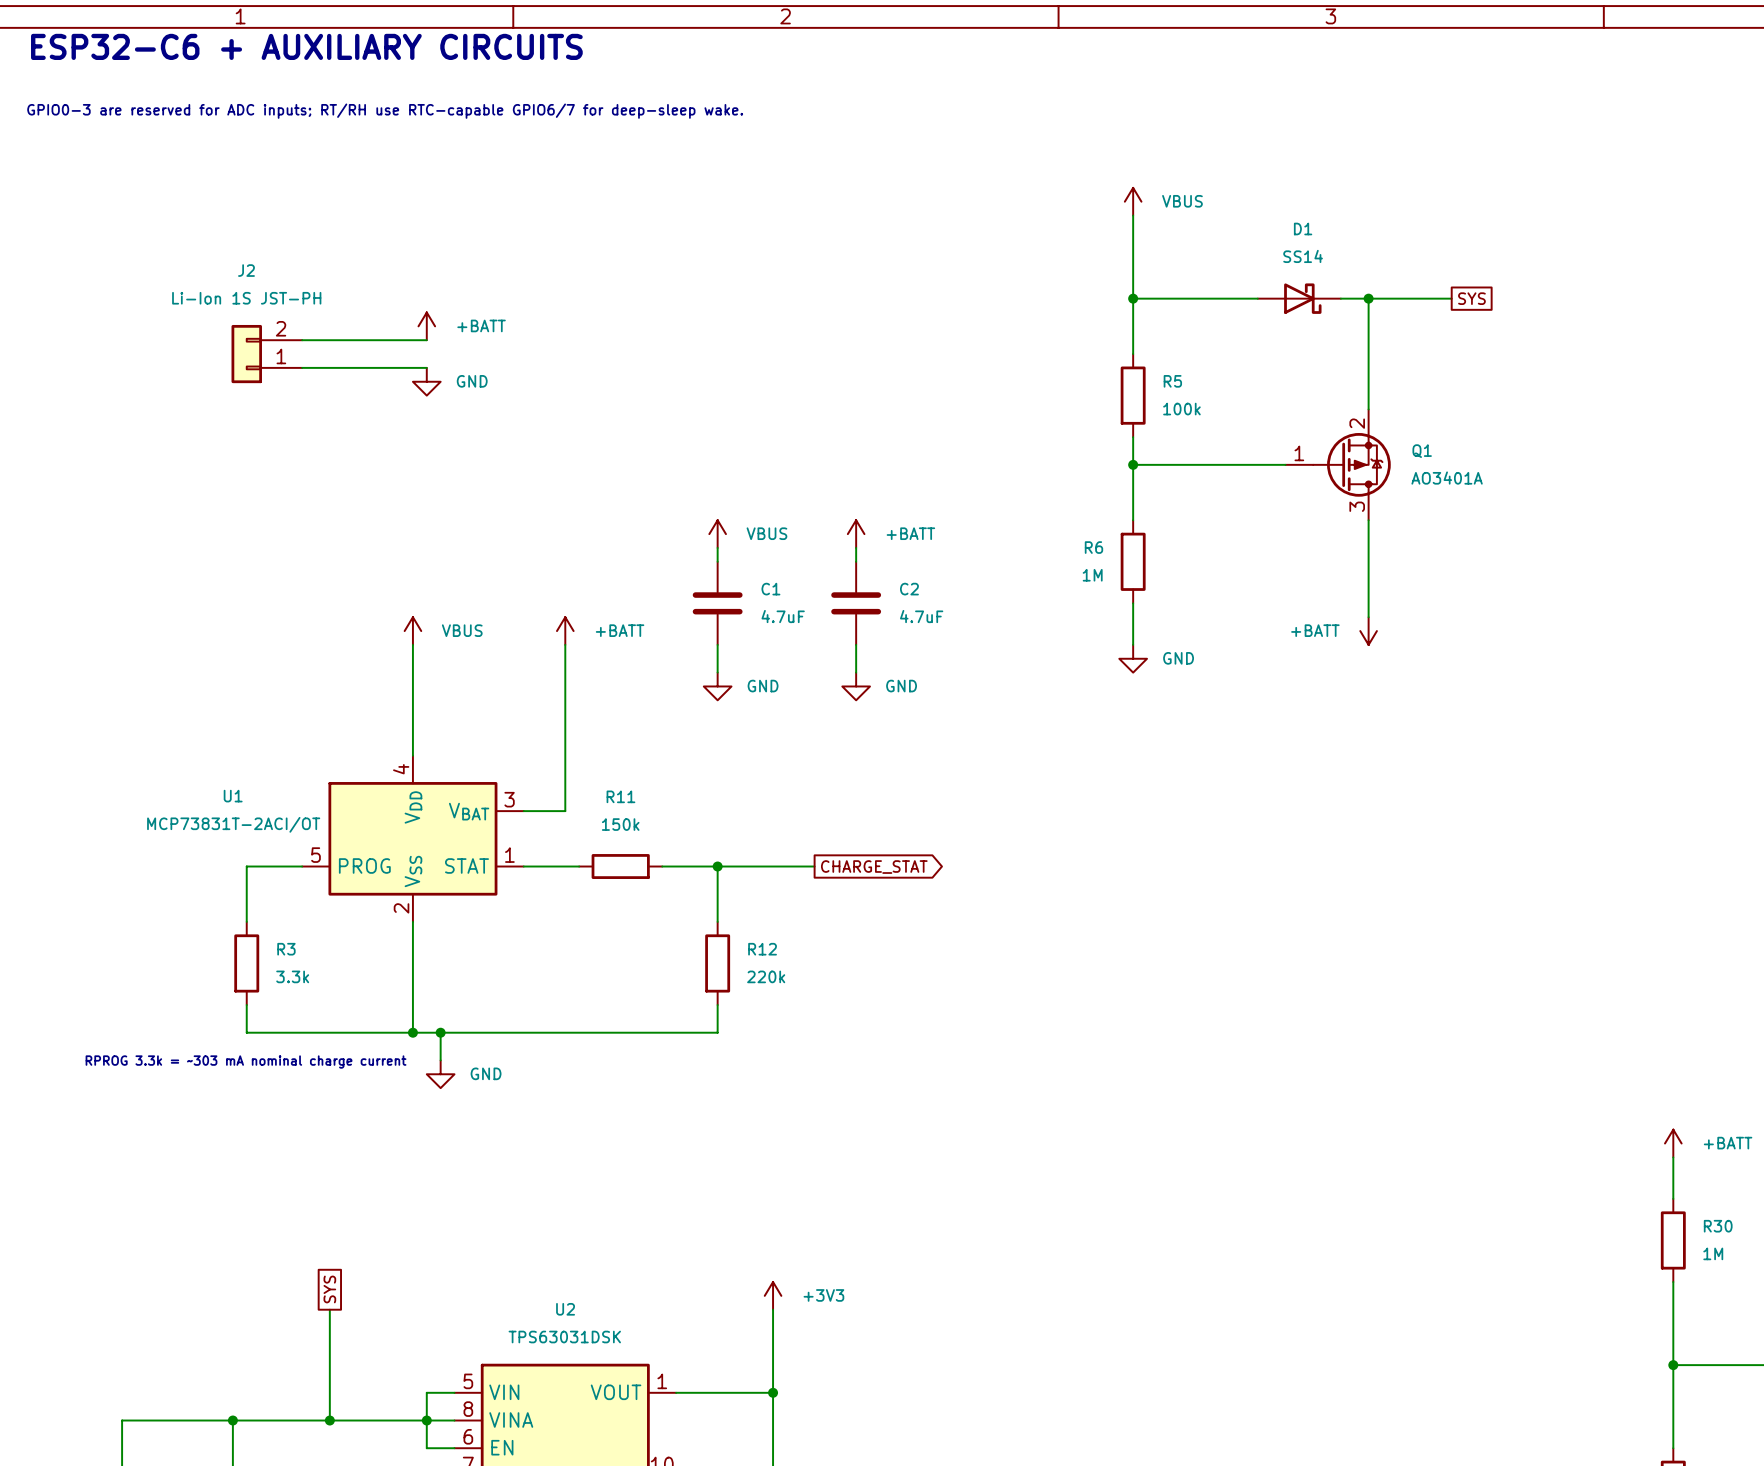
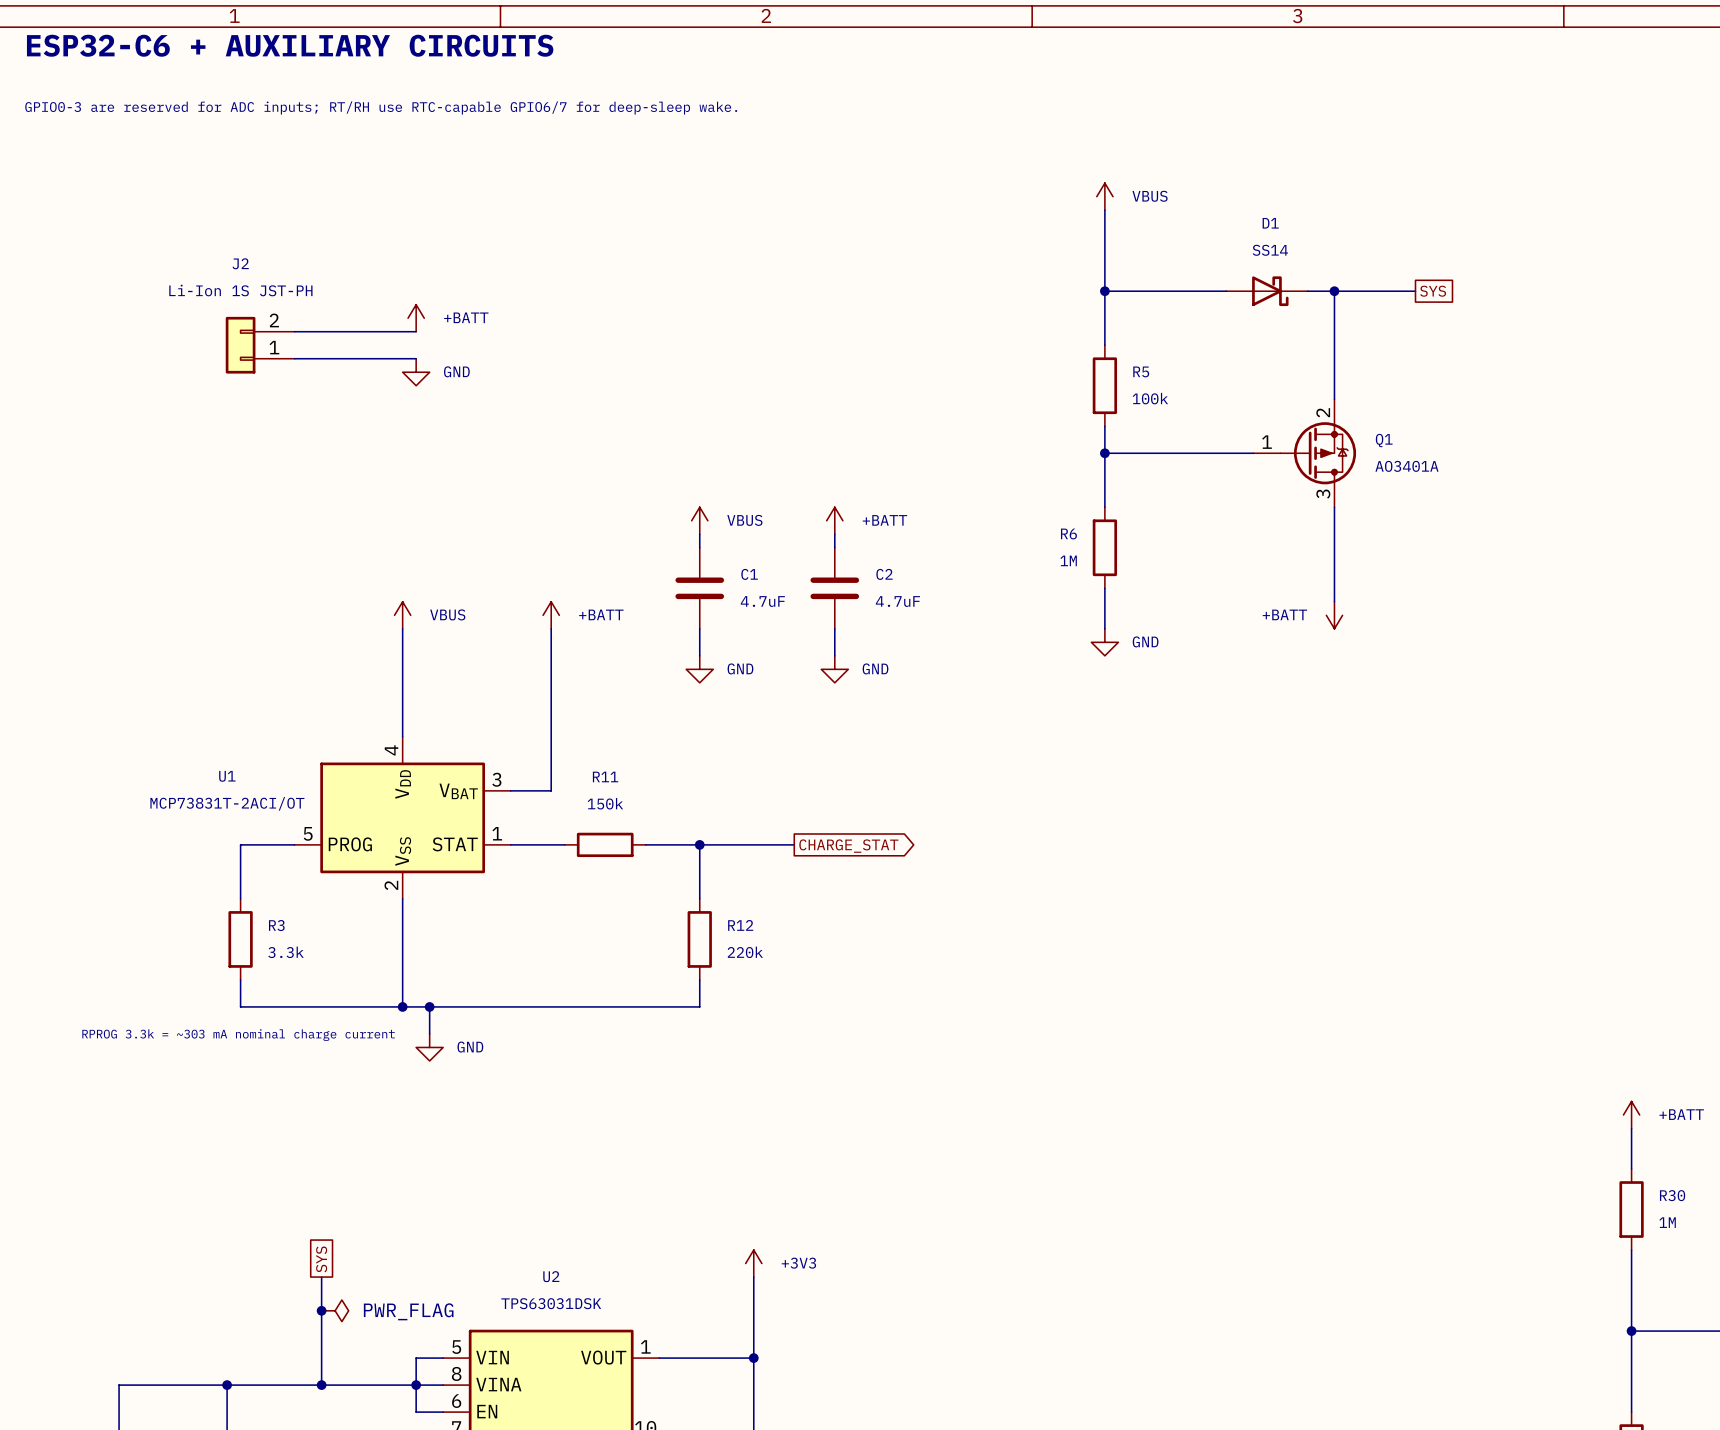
junction: none -> (321, 1310)
power symbol: none -> PWR_FLAG (335, 1310)

